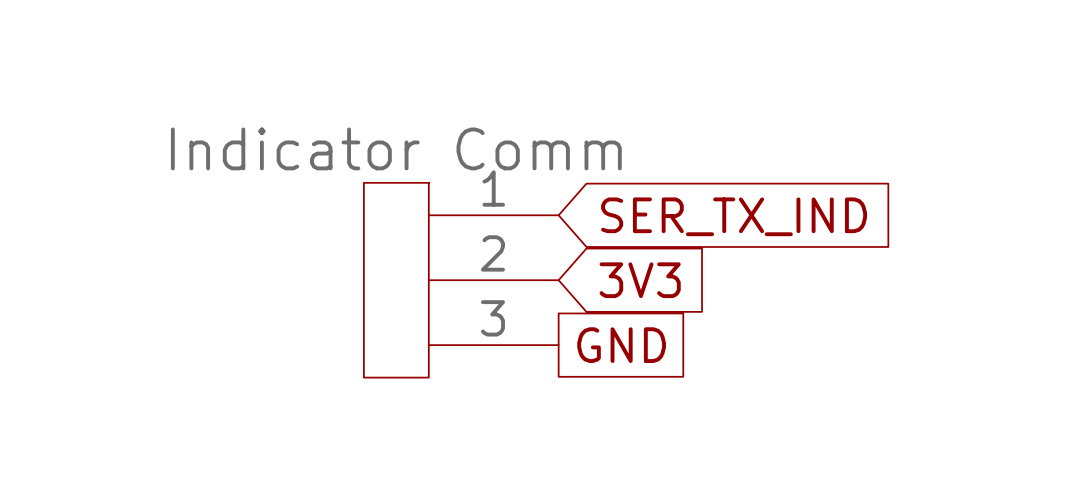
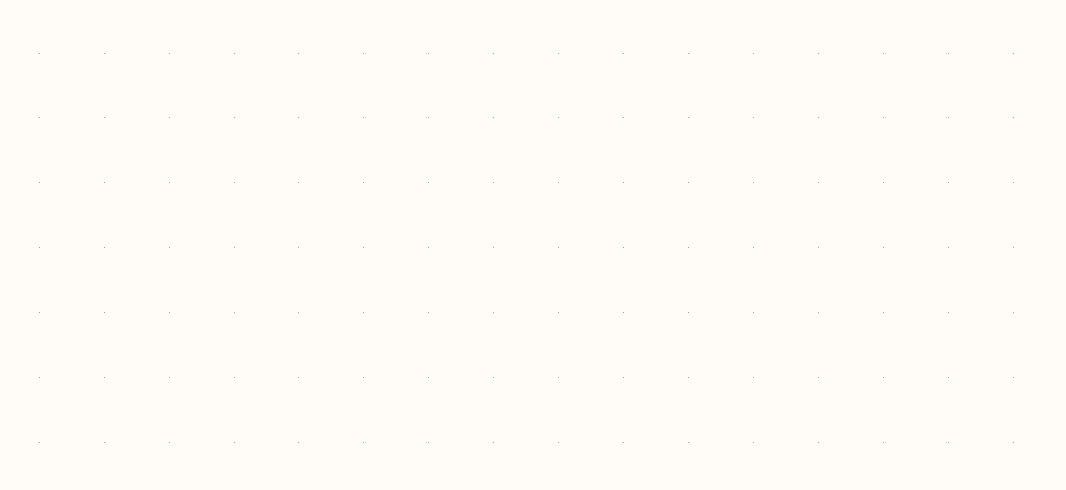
global label: SER_TX_IND (734, 216) -> none
part: Indicator Comm (461, 280) -> none
global label: 3V3 (640, 280) -> none
global label: GND (621, 345) -> none

